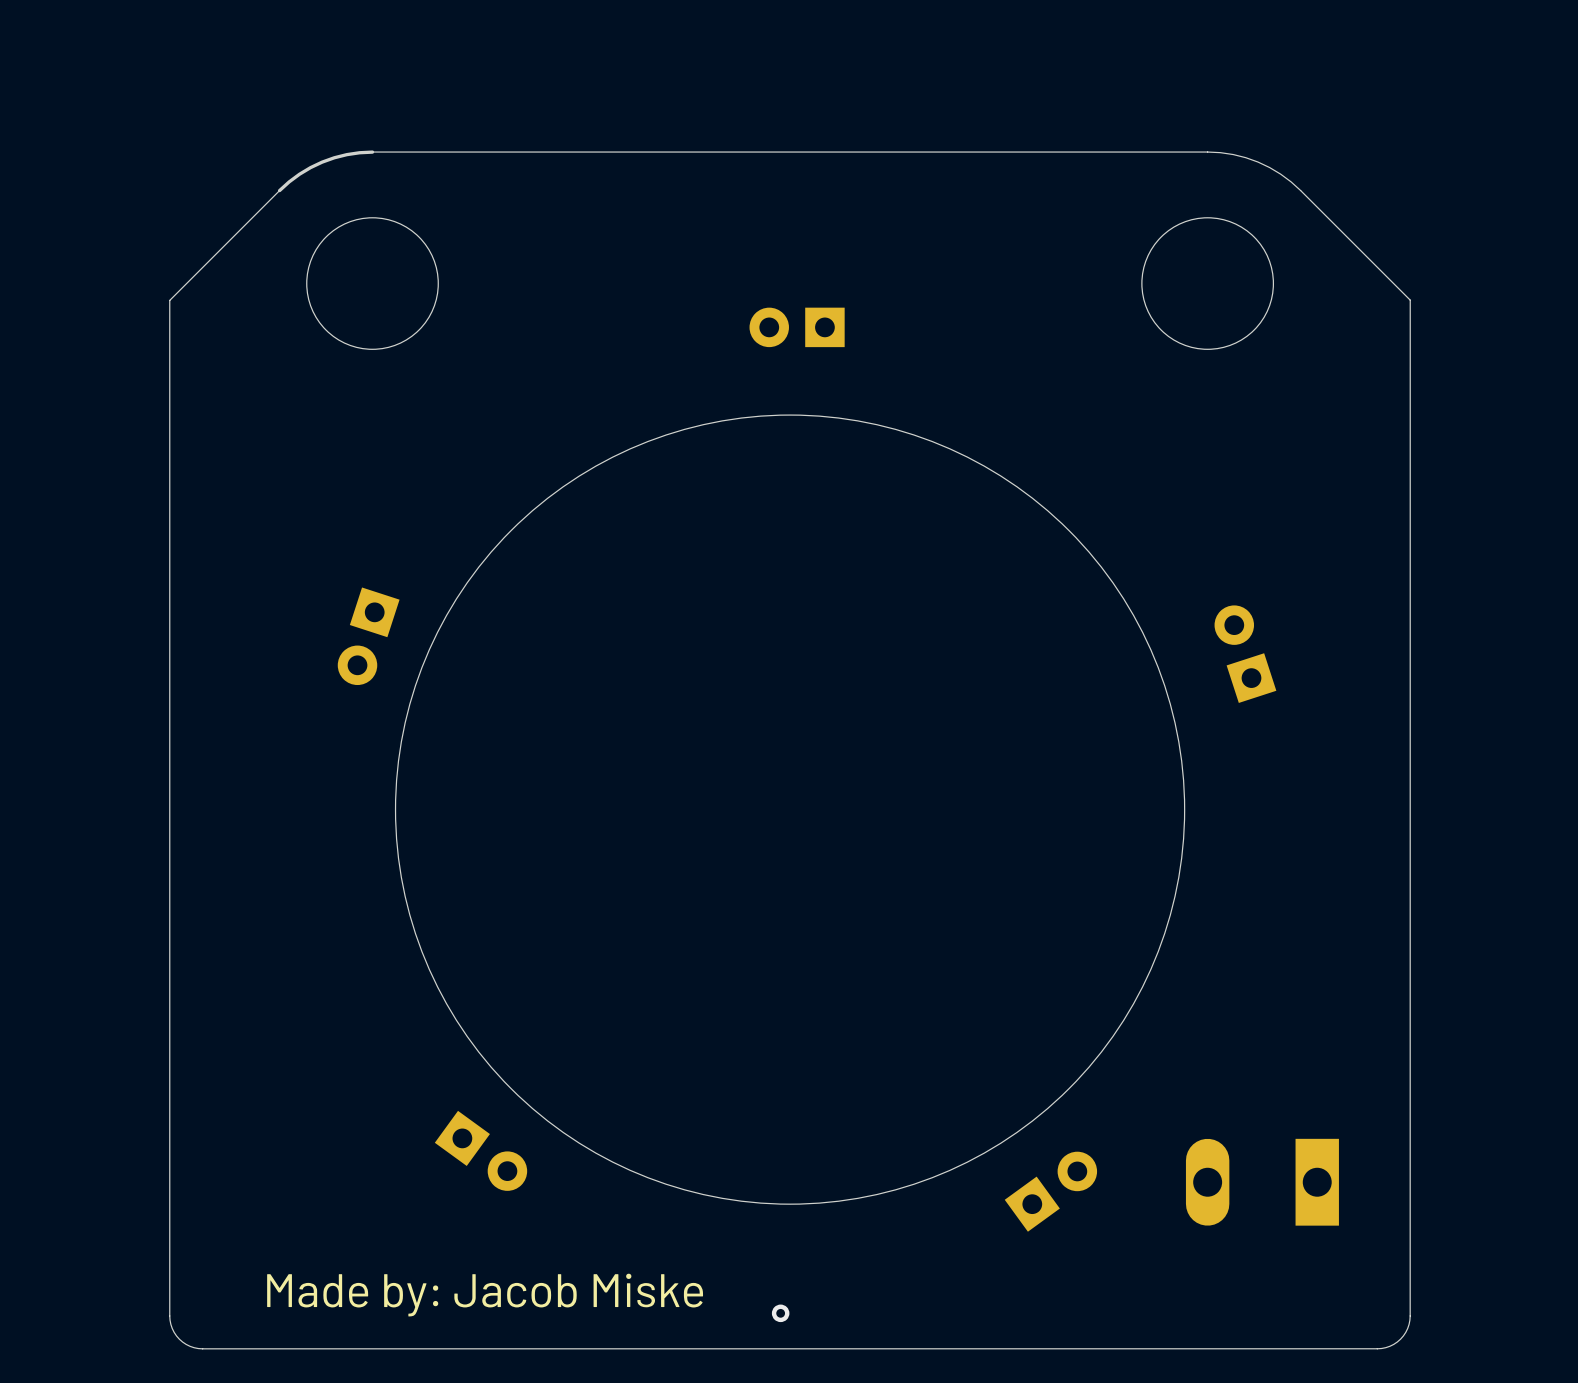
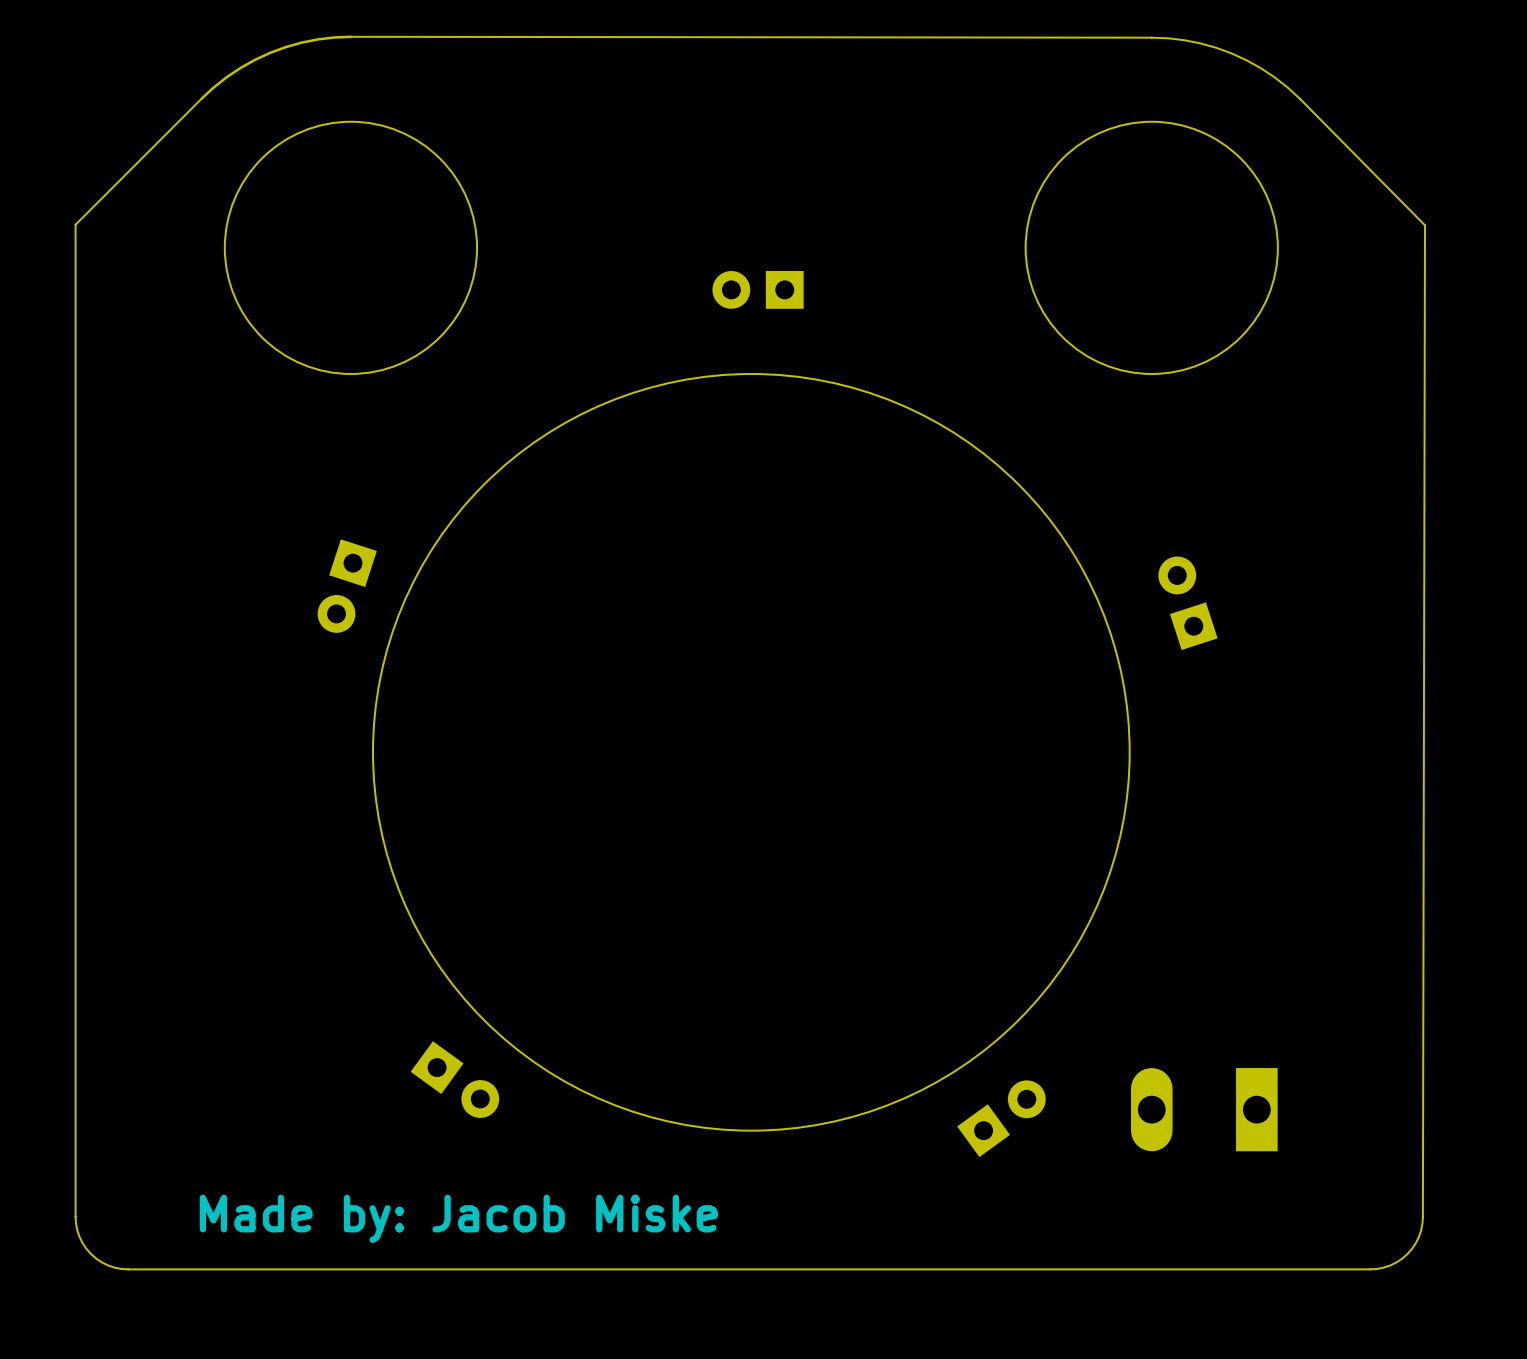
board edge: (279, 190) (299, 174) (322, 162) (346, 154) (372, 152) (1220, 152) (1257, 162) (1291, 181) (1410, 300) (1410, 1315) (1407, 1328) (1400, 1339) (1389, 1346) (1377, 1348) (202, 1348) (190, 1346) (179, 1339) (172, 1328) (169, 1315) (169, 300) (279, 190) -> (350, 36) (317, 39) (285, 47) (255, 59) (226, 77) (201, 98) (75, 224) (75, 1216) (77, 1230) (86, 1248) (96, 1258) (108, 1265) (128, 1269) (1370, 1269) (1383, 1267) (1402, 1258) (1415, 1243) (1421, 1230) (1422, 1216) (1425, 225) (1300, 99) (1275, 77) (1232, 53) (1184, 40) (1151, 37) (350, 36)
round board edge size: [306, 217, 439, 350] -> [224, 121, 478, 375]
round board edge size: [1141, 217, 1274, 350] -> [1025, 121, 1279, 375]
via: (780, 1313) -> none

